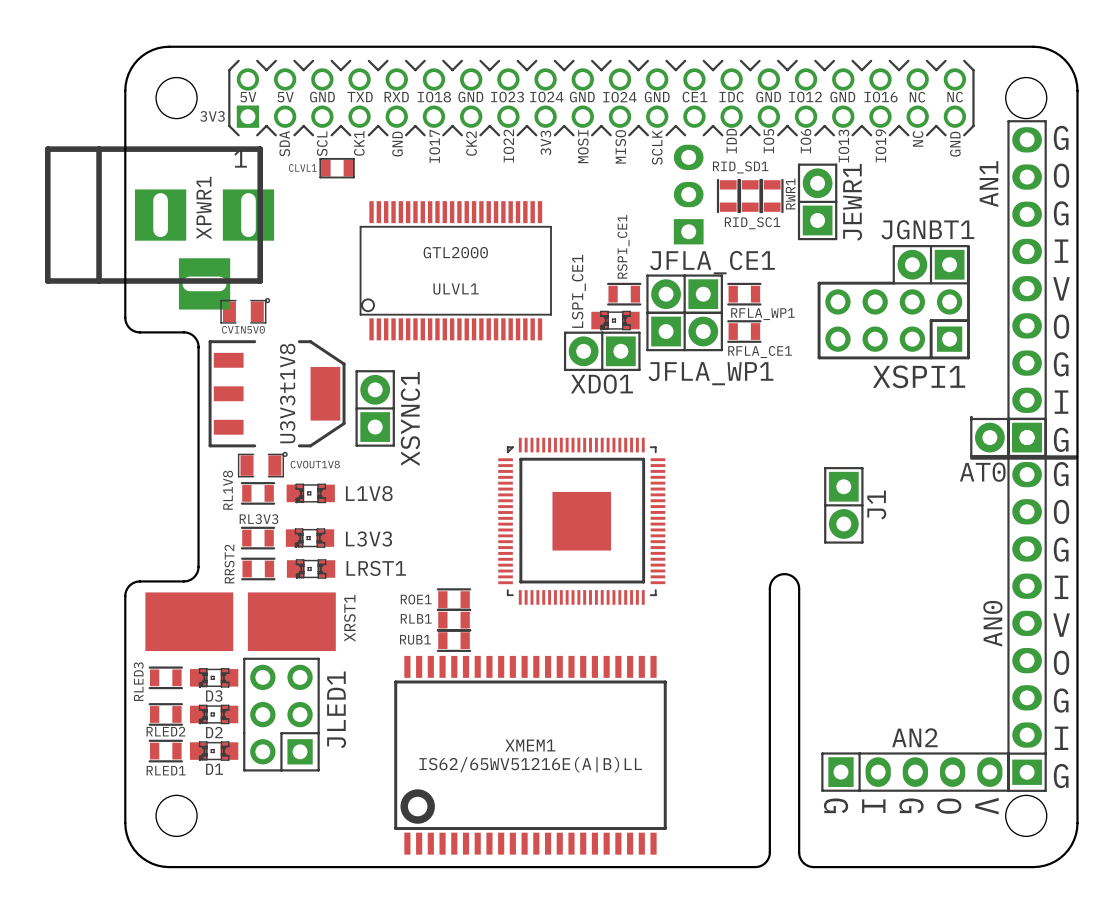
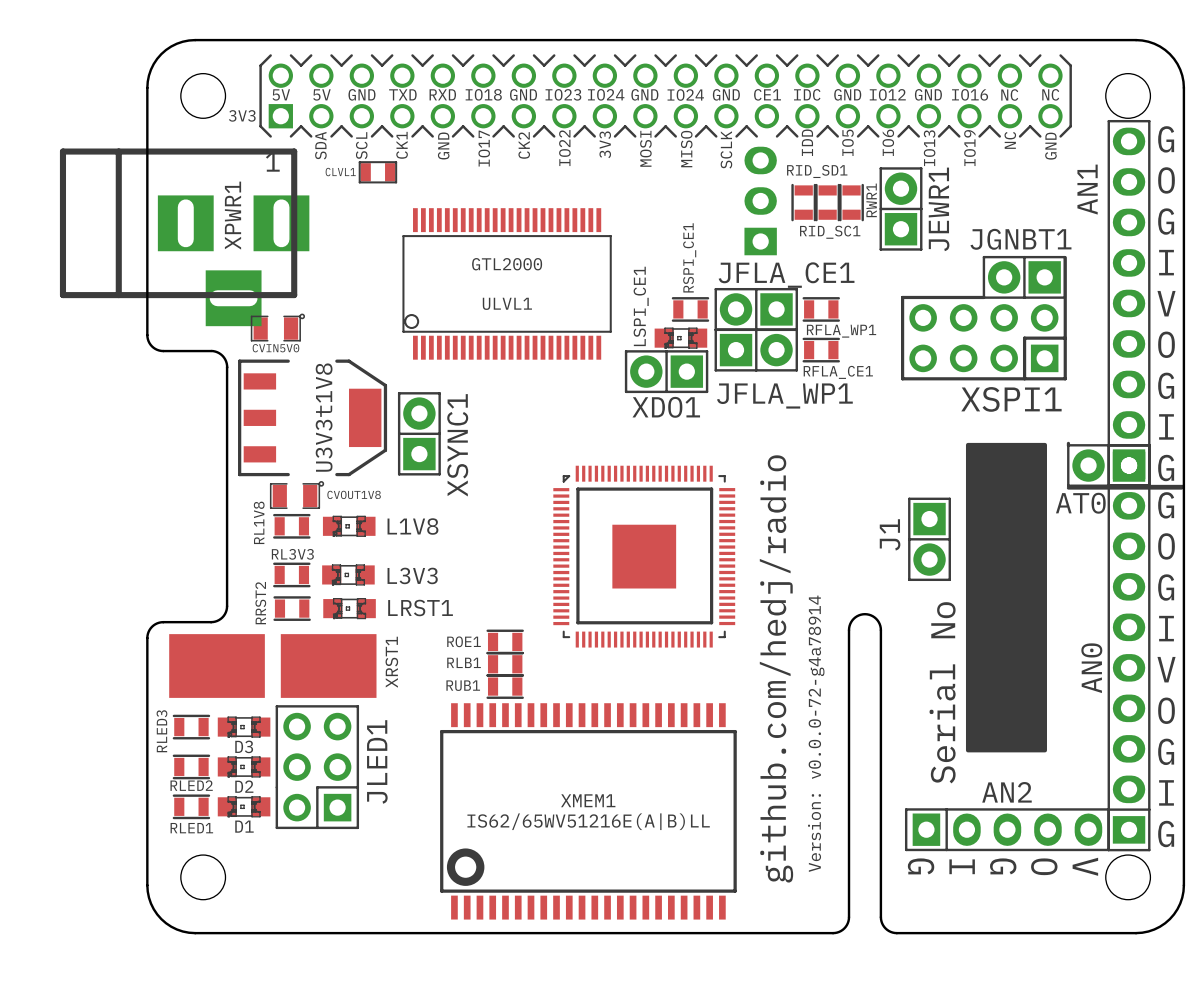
drawing: none -> [965, 442, 1047, 753]
J1 name position: J1 (876, 504) -> J1 (890, 534)
text: none -> github.com/hedj/radio (776, 668)
text: none -> Serial No (942, 692)
text: none -> Version: v0.0.0-72-g4a78914 (816, 733)

